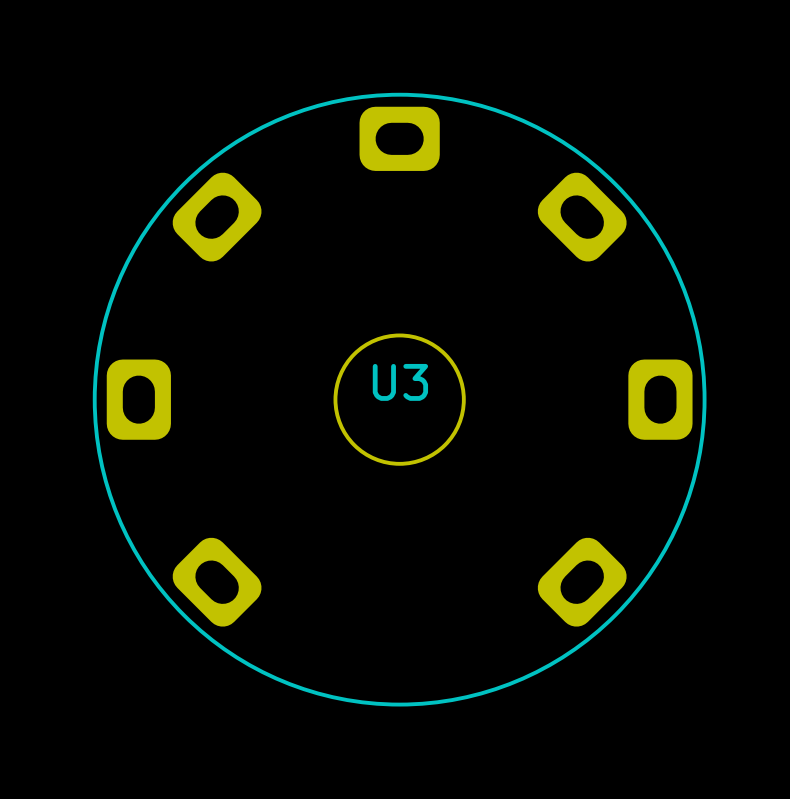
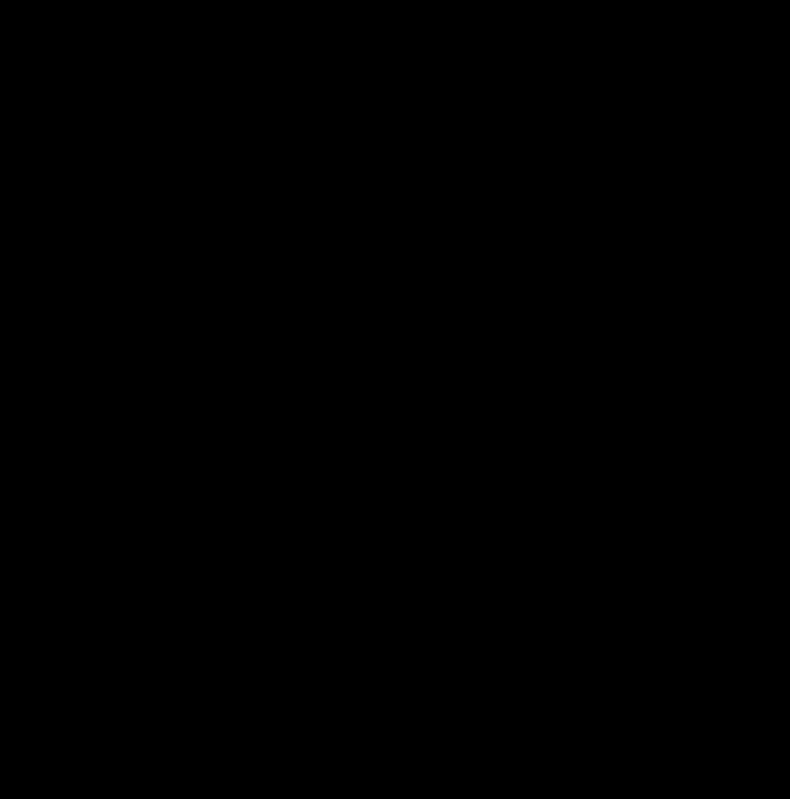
U3: (399, 399) -> none

